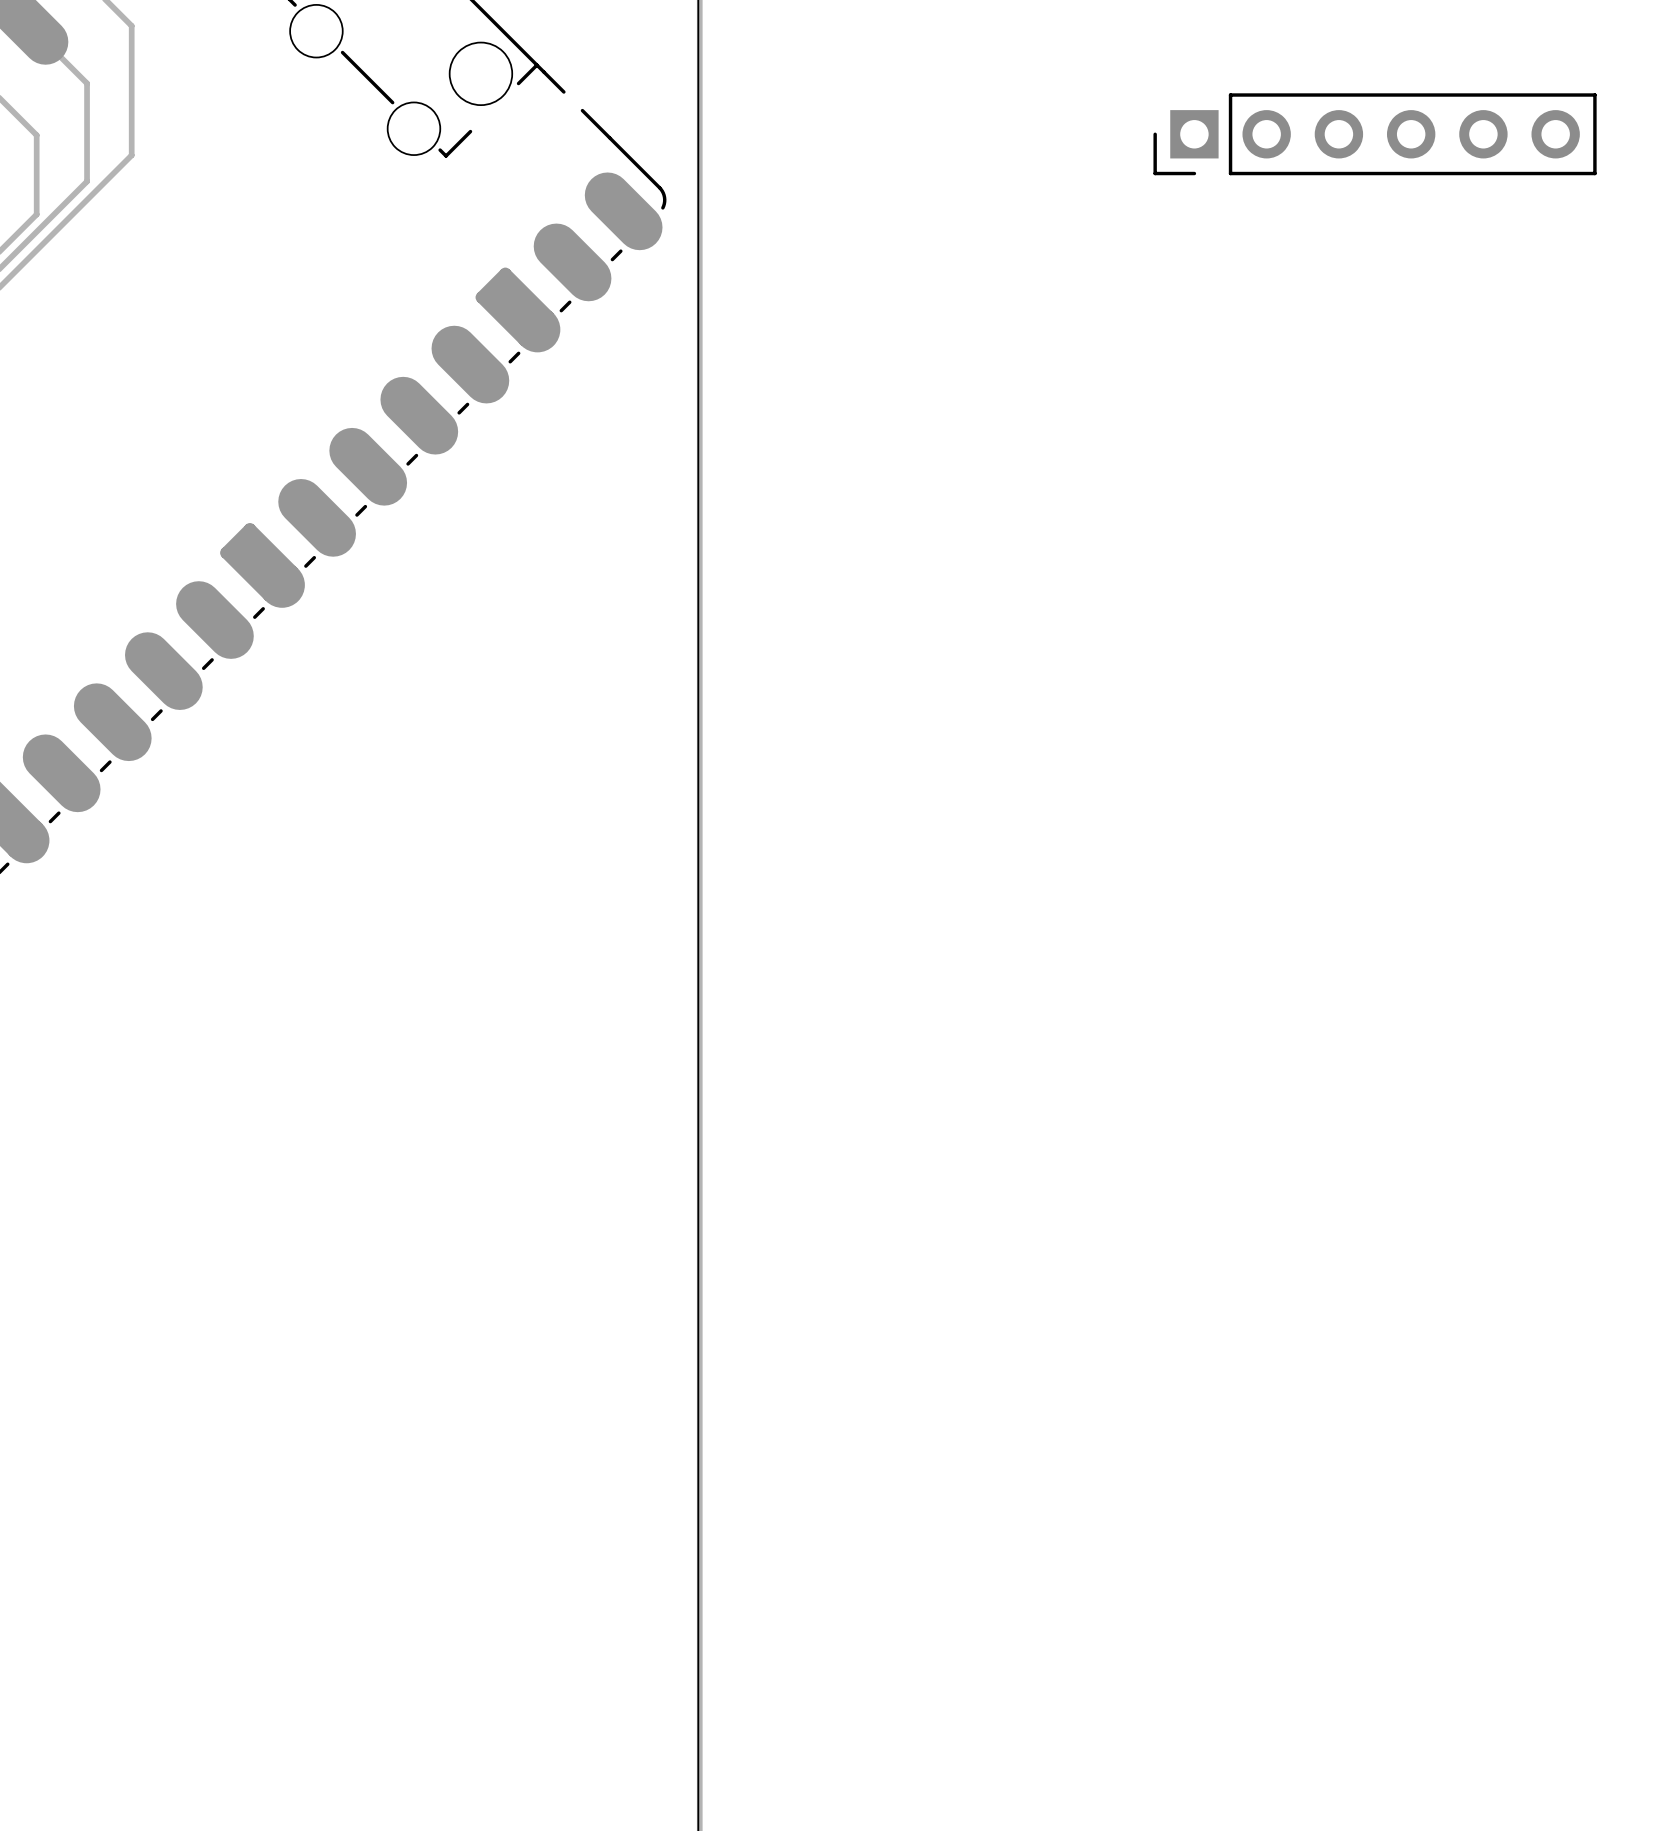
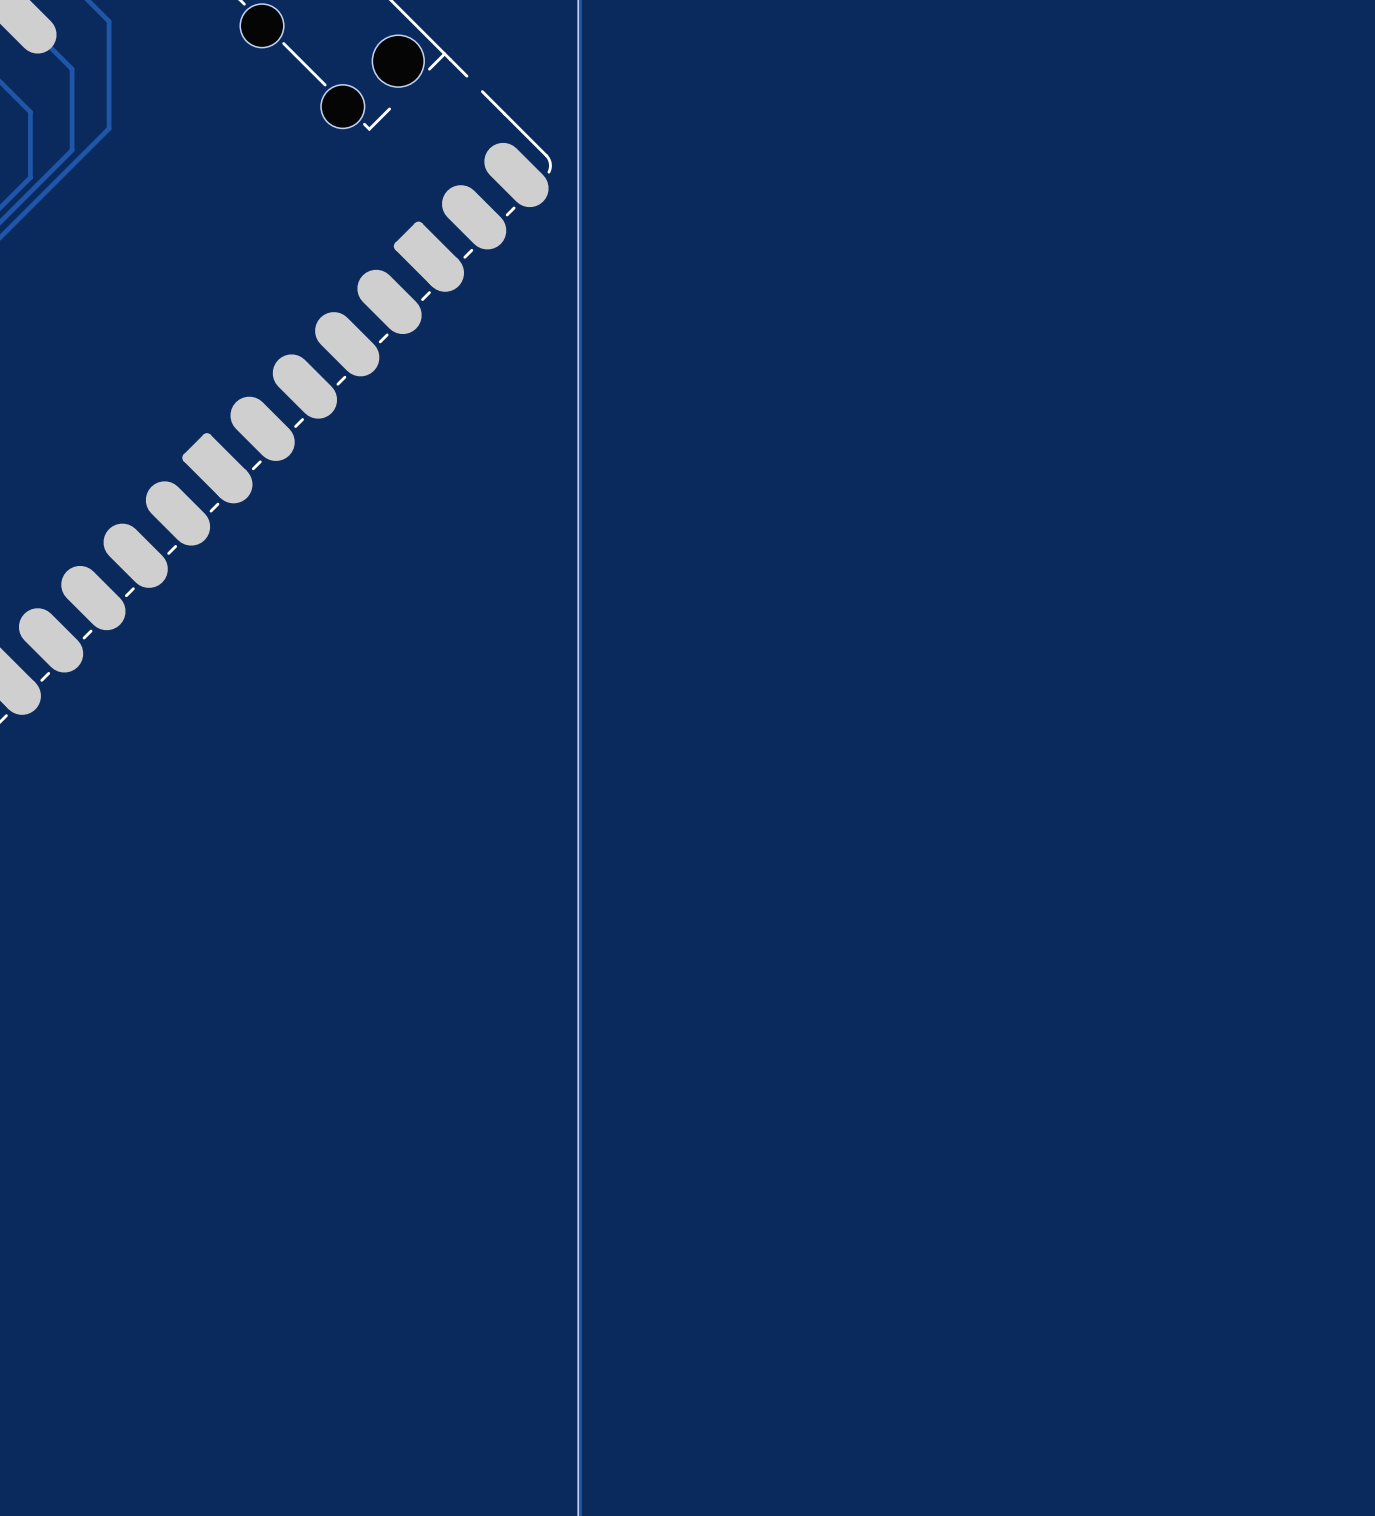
part: (1375, 134) -> none

